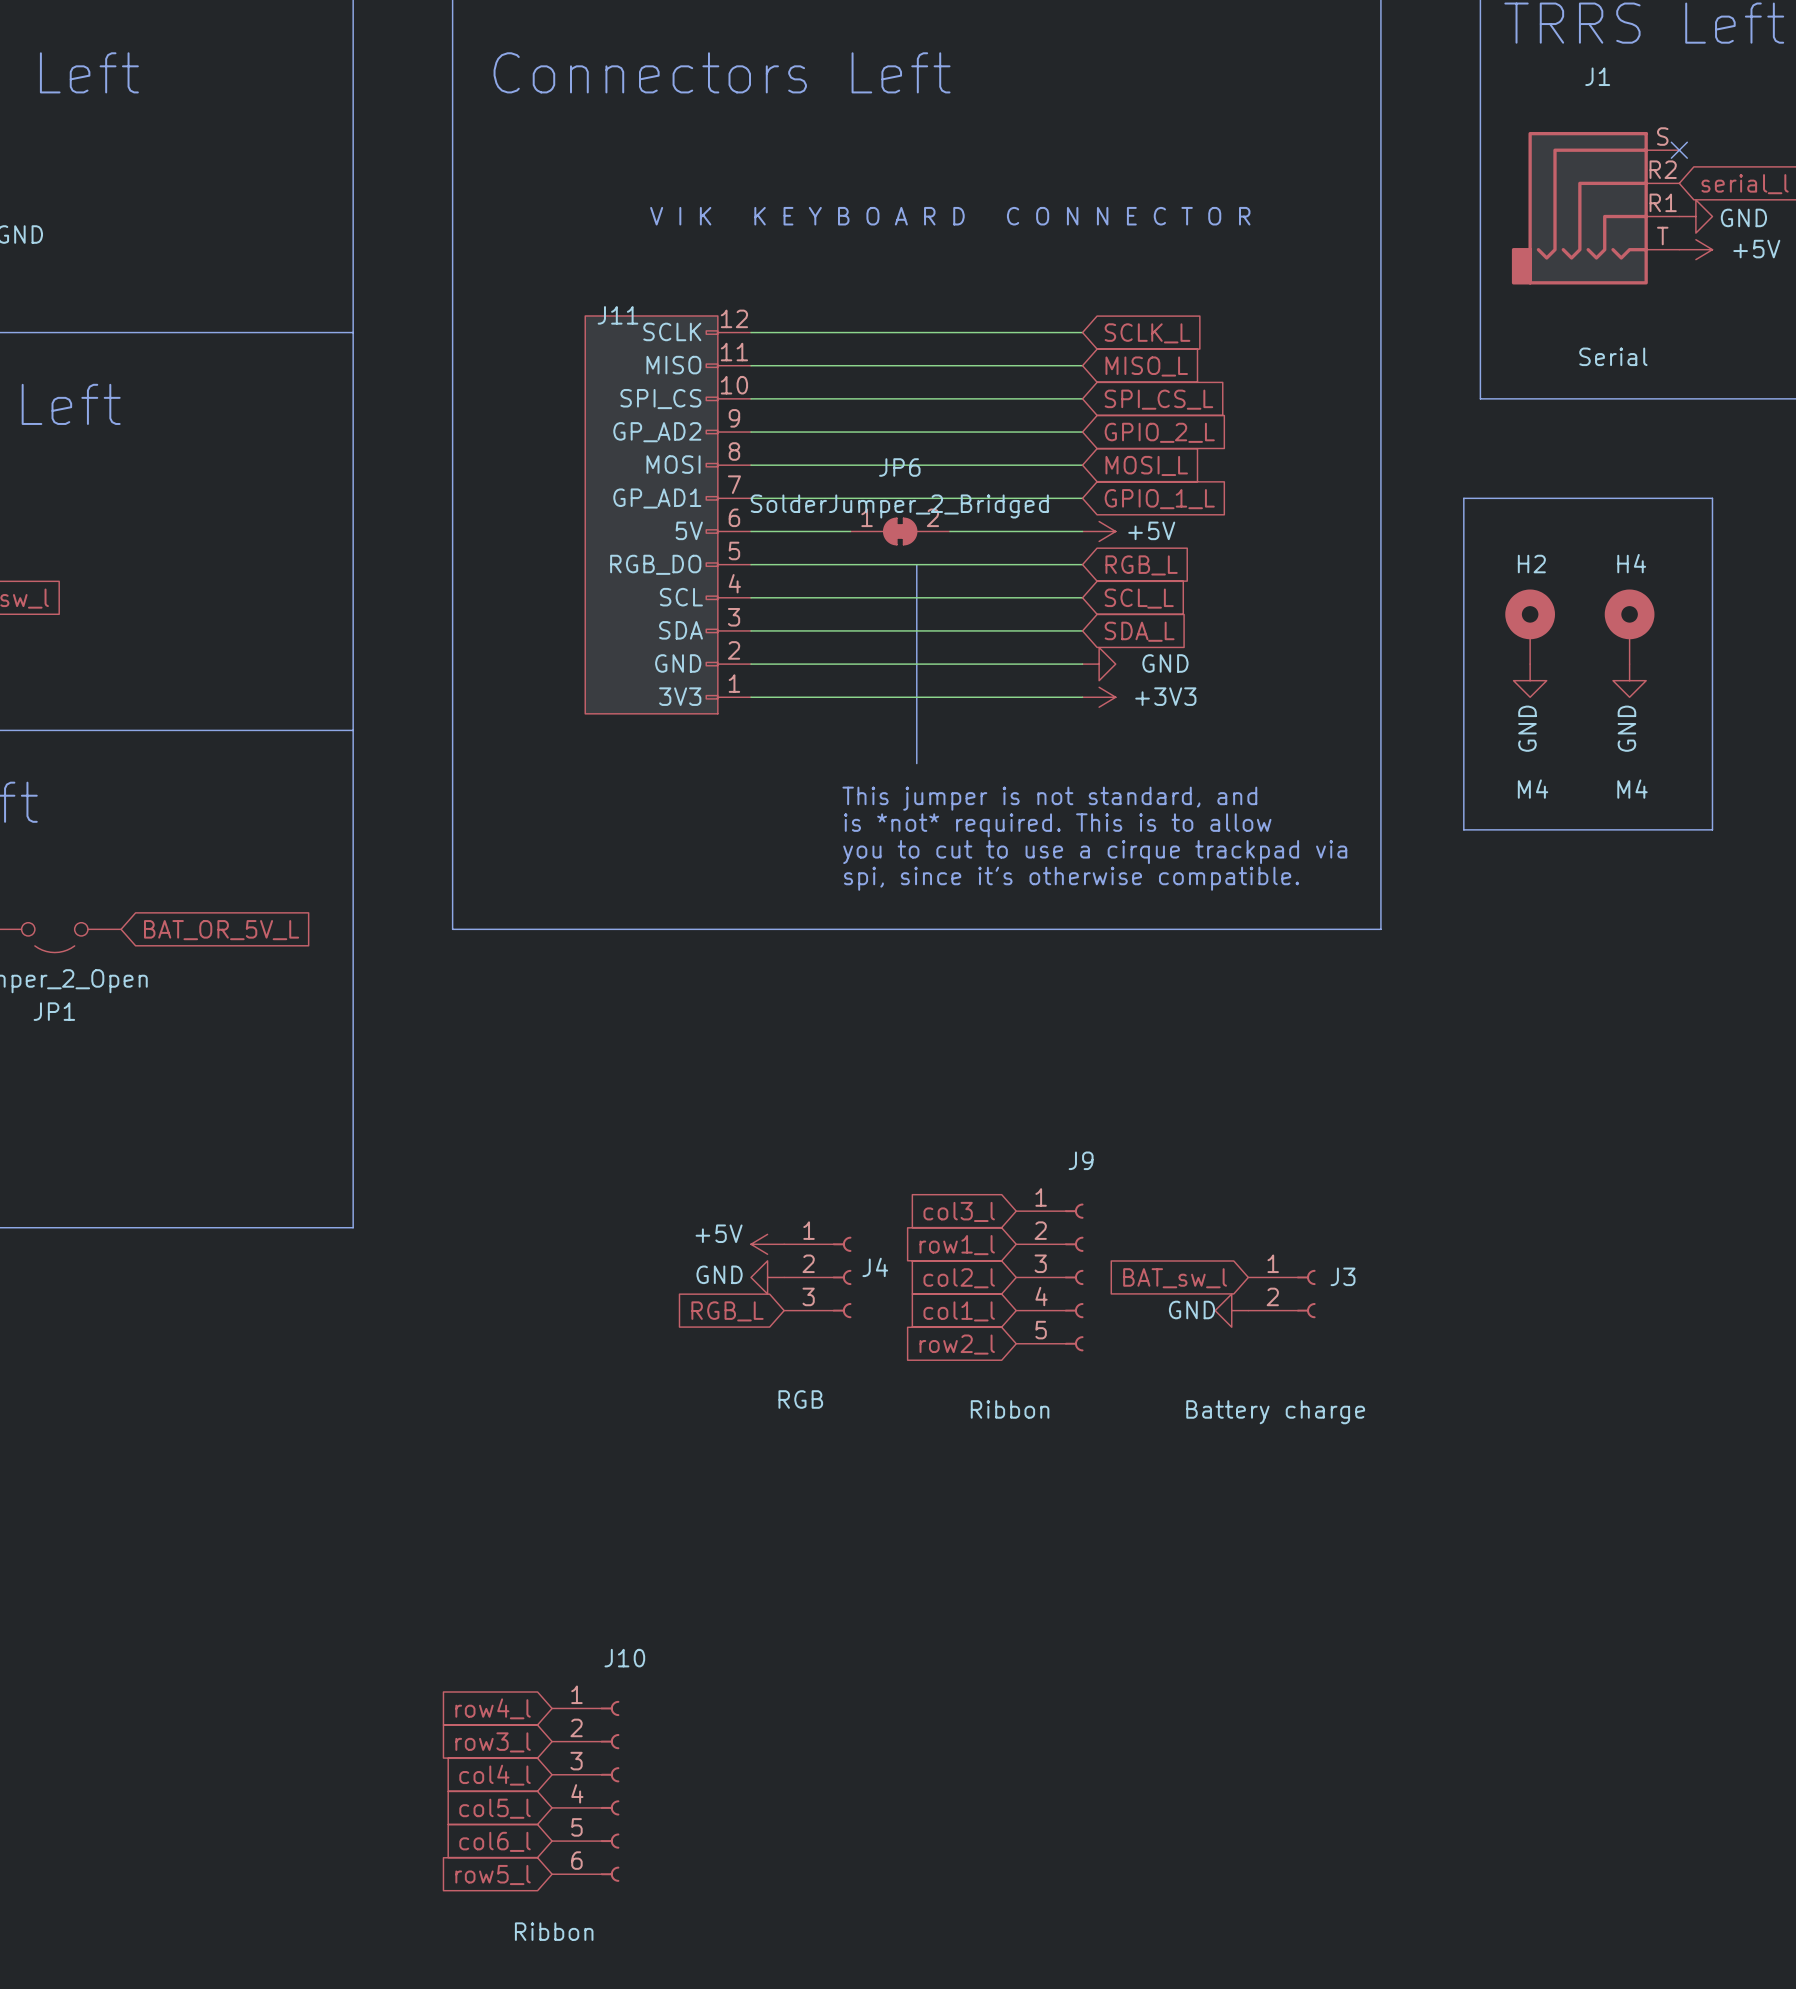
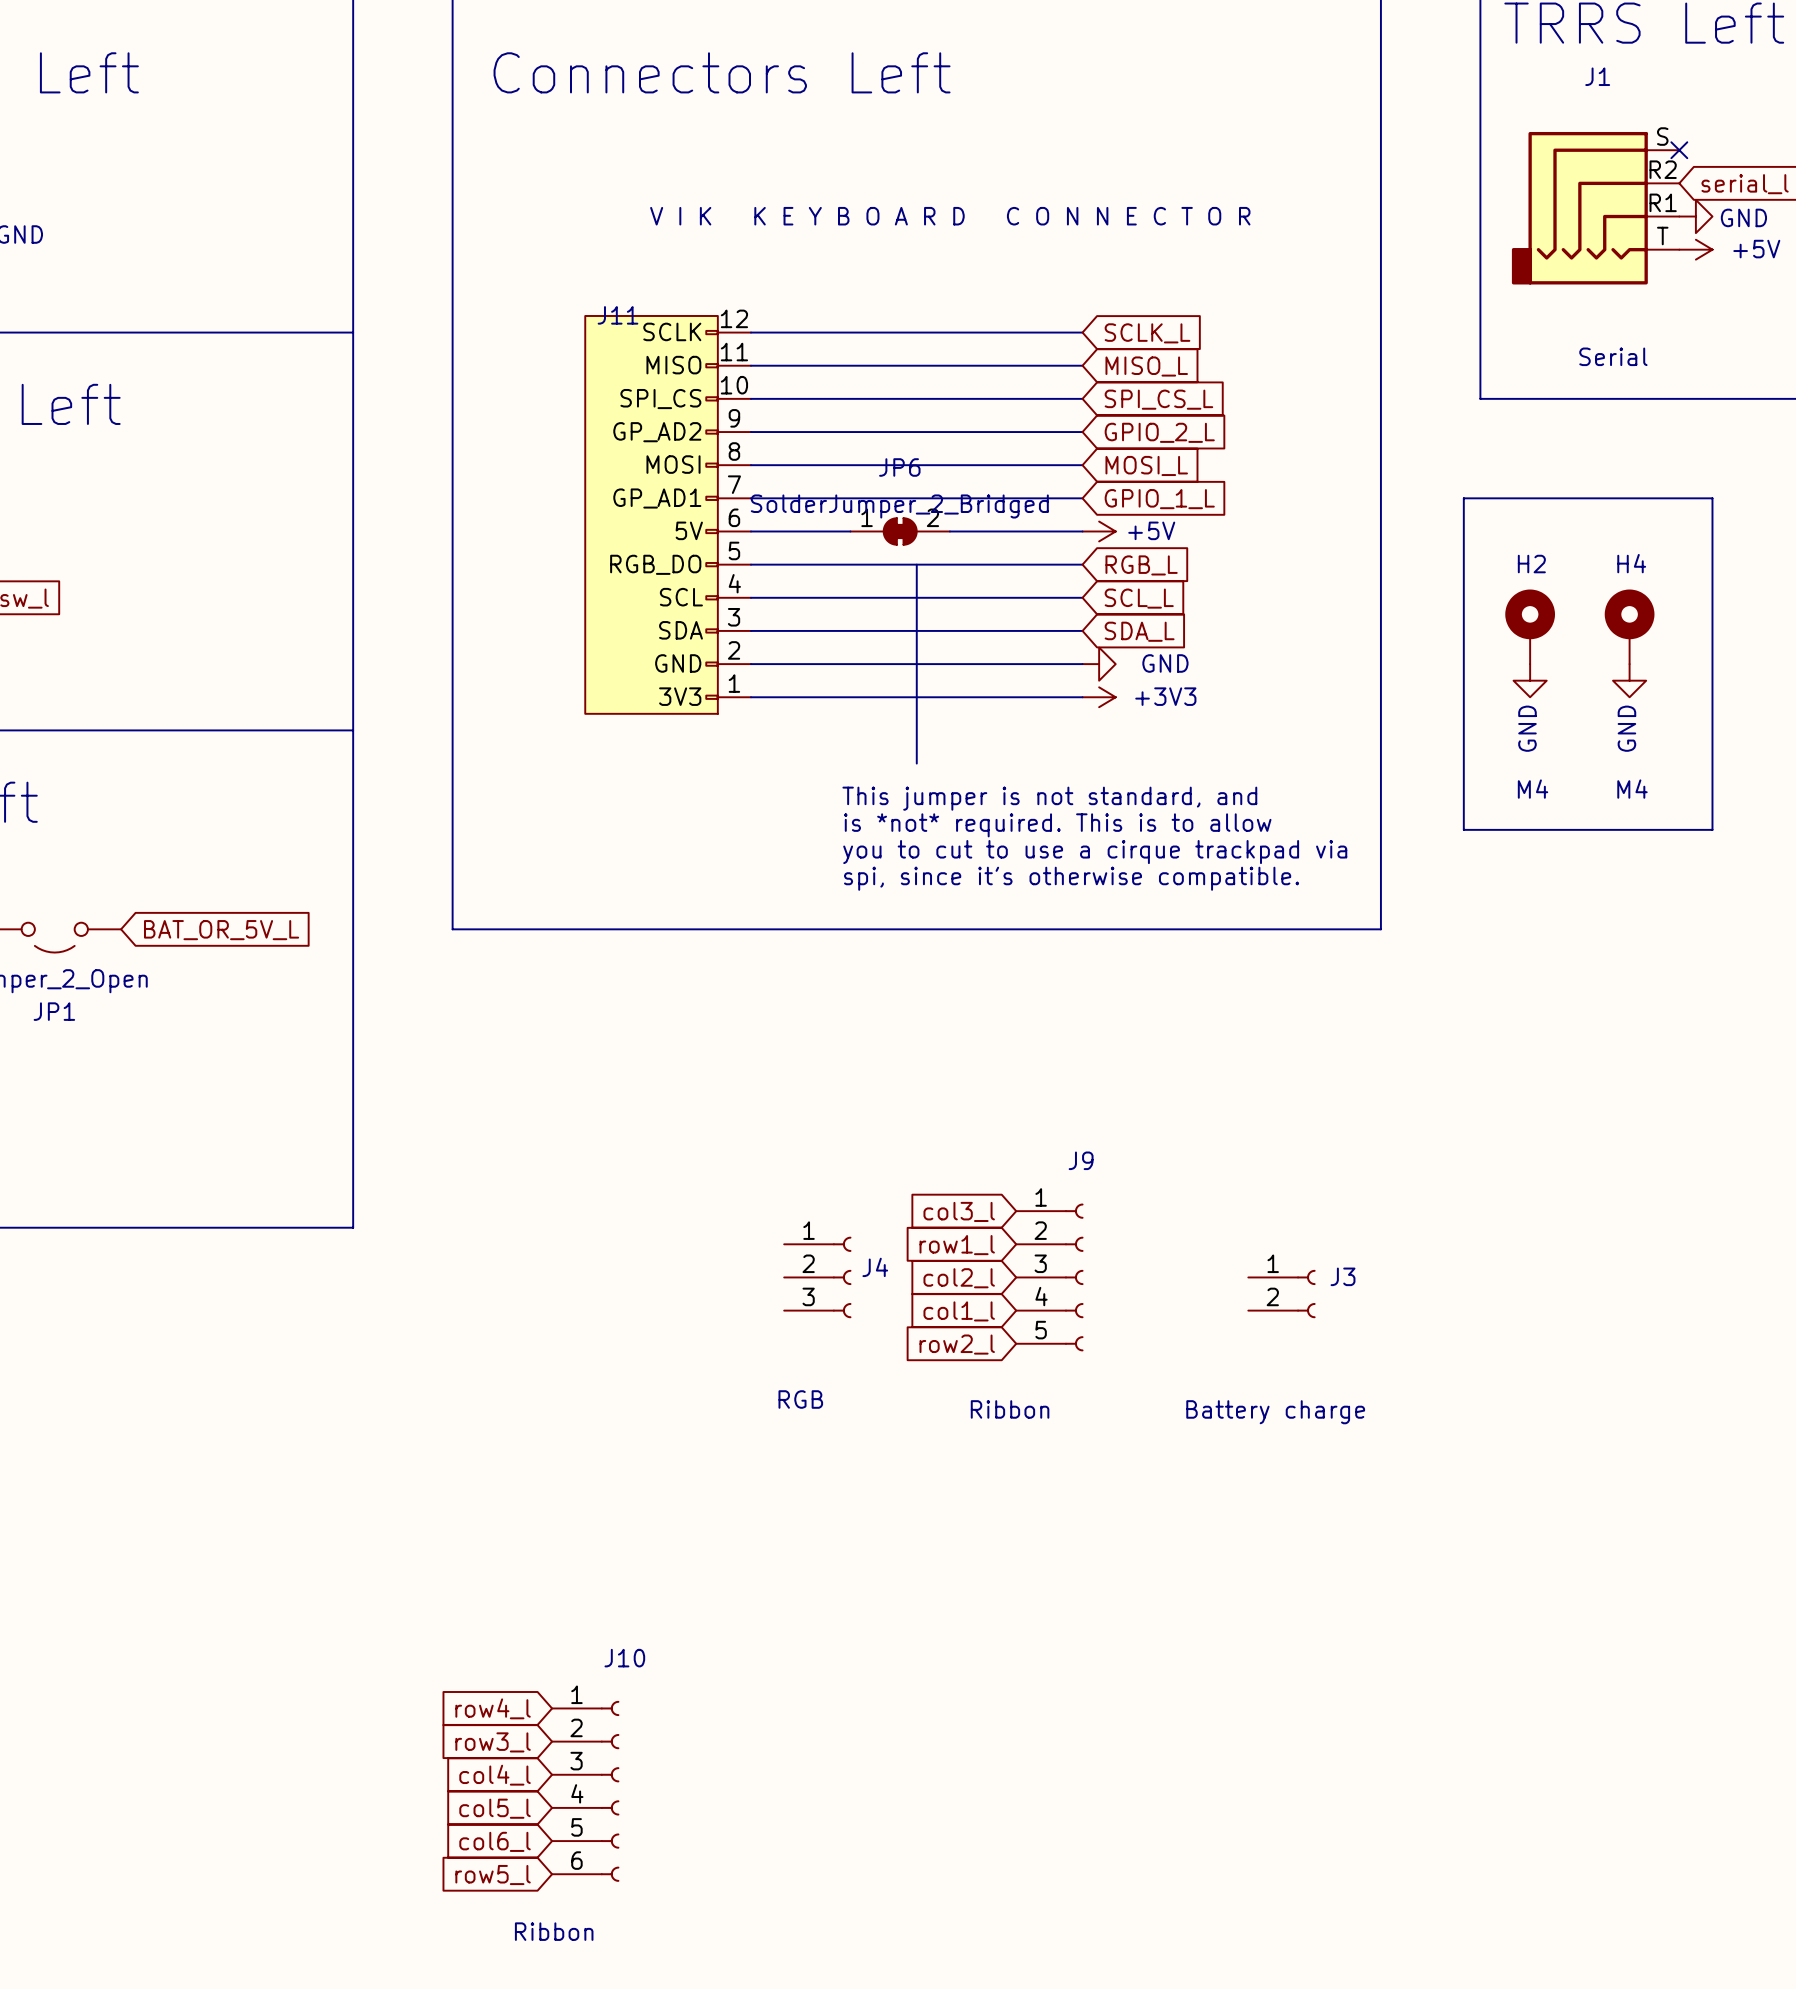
power symbol: +5V (767, 1244) -> none
power symbol: GND (767, 1277) -> none
global label: BAT_sw_l (1175, 1278) -> none
power symbol: GND (1231, 1310) -> none
global label: RGB_L (727, 1311) -> none

